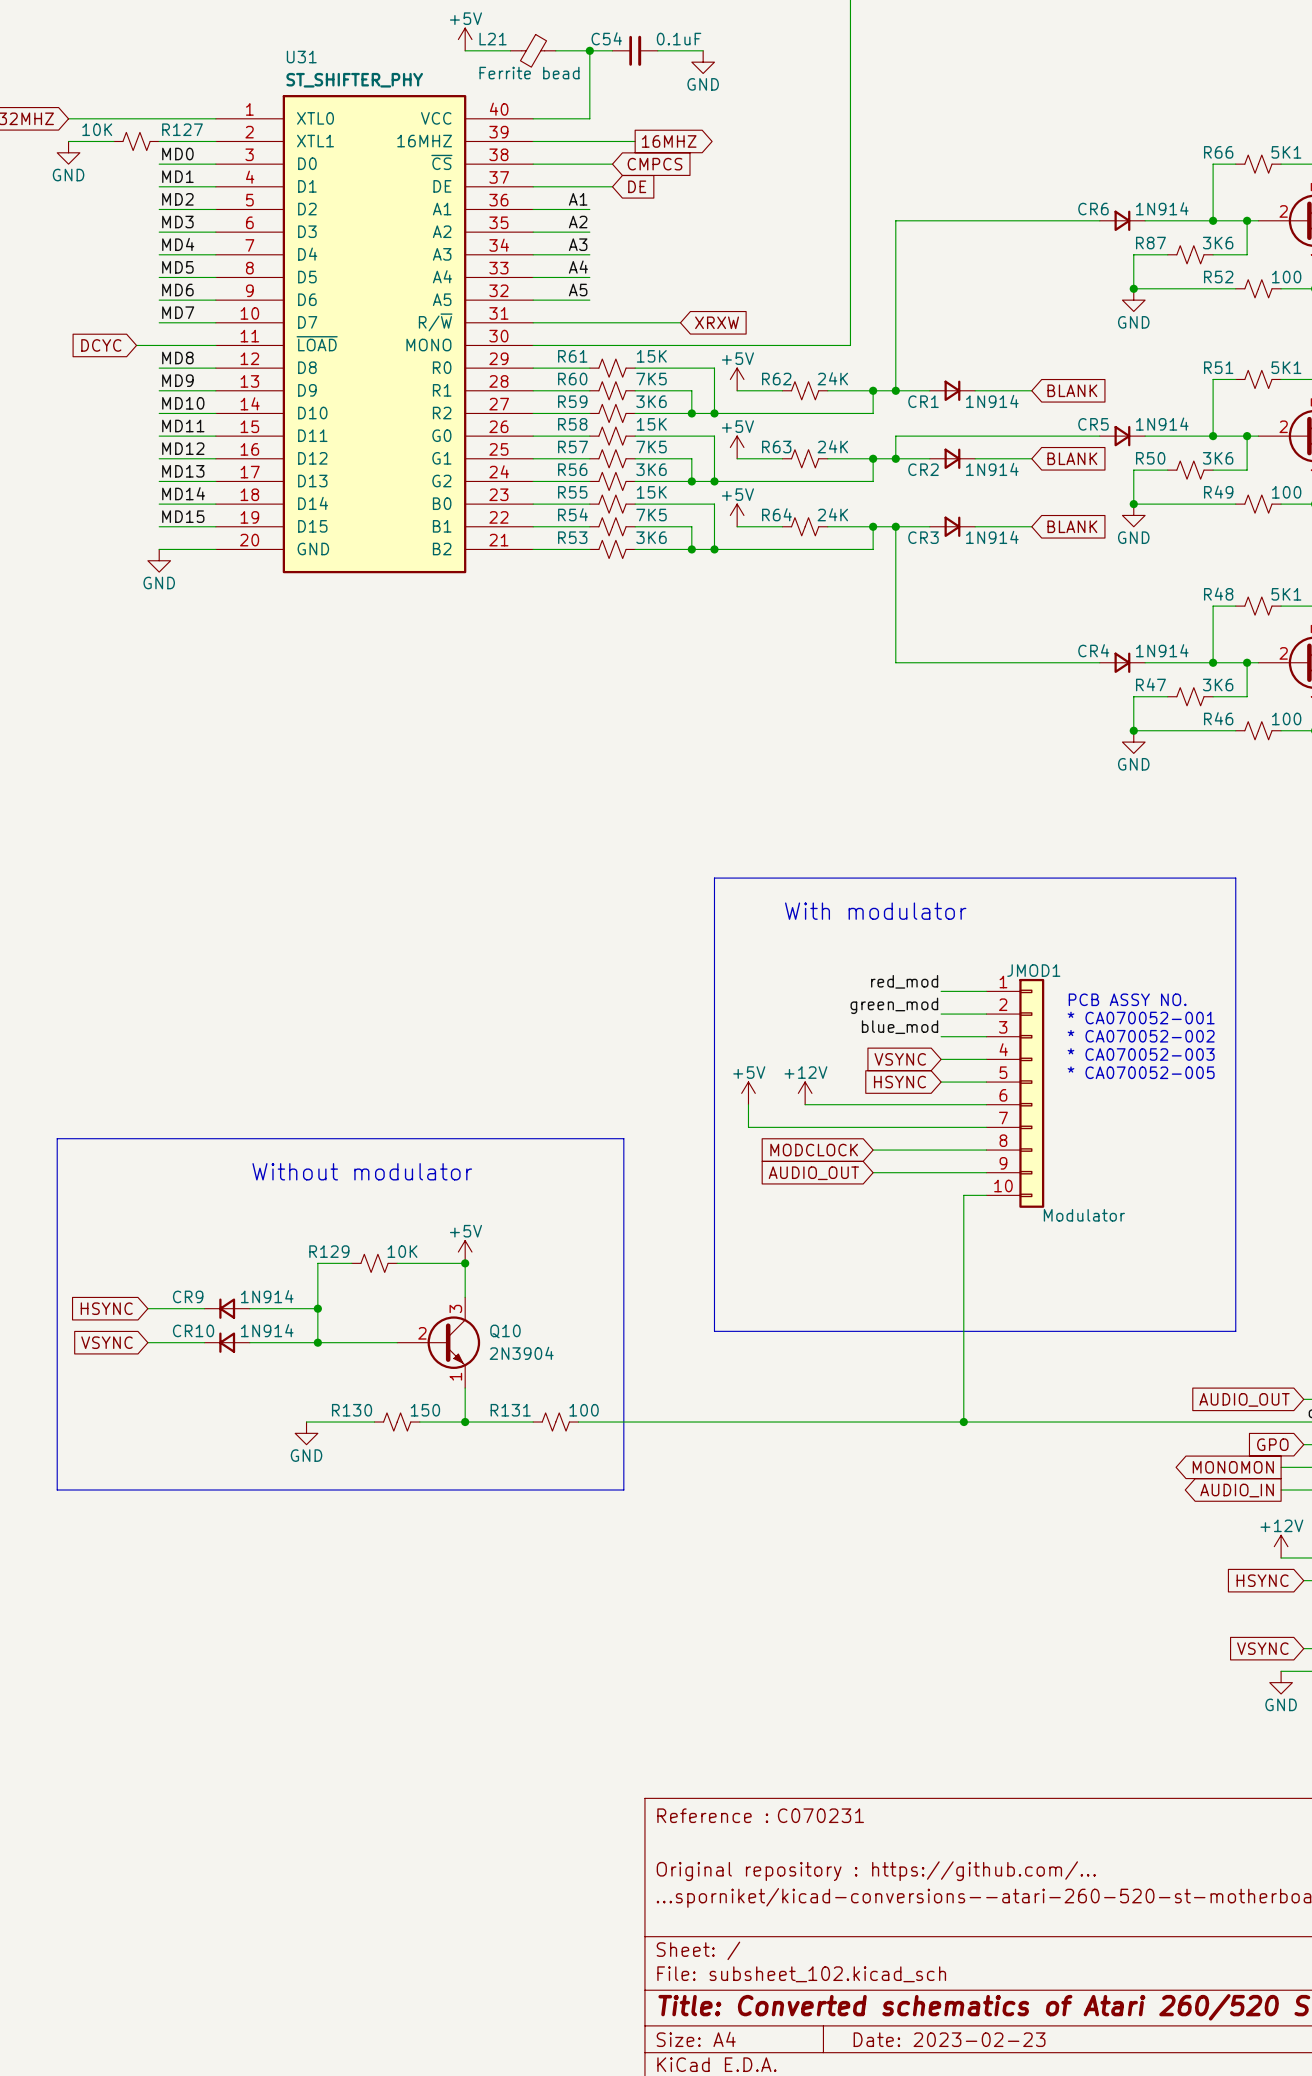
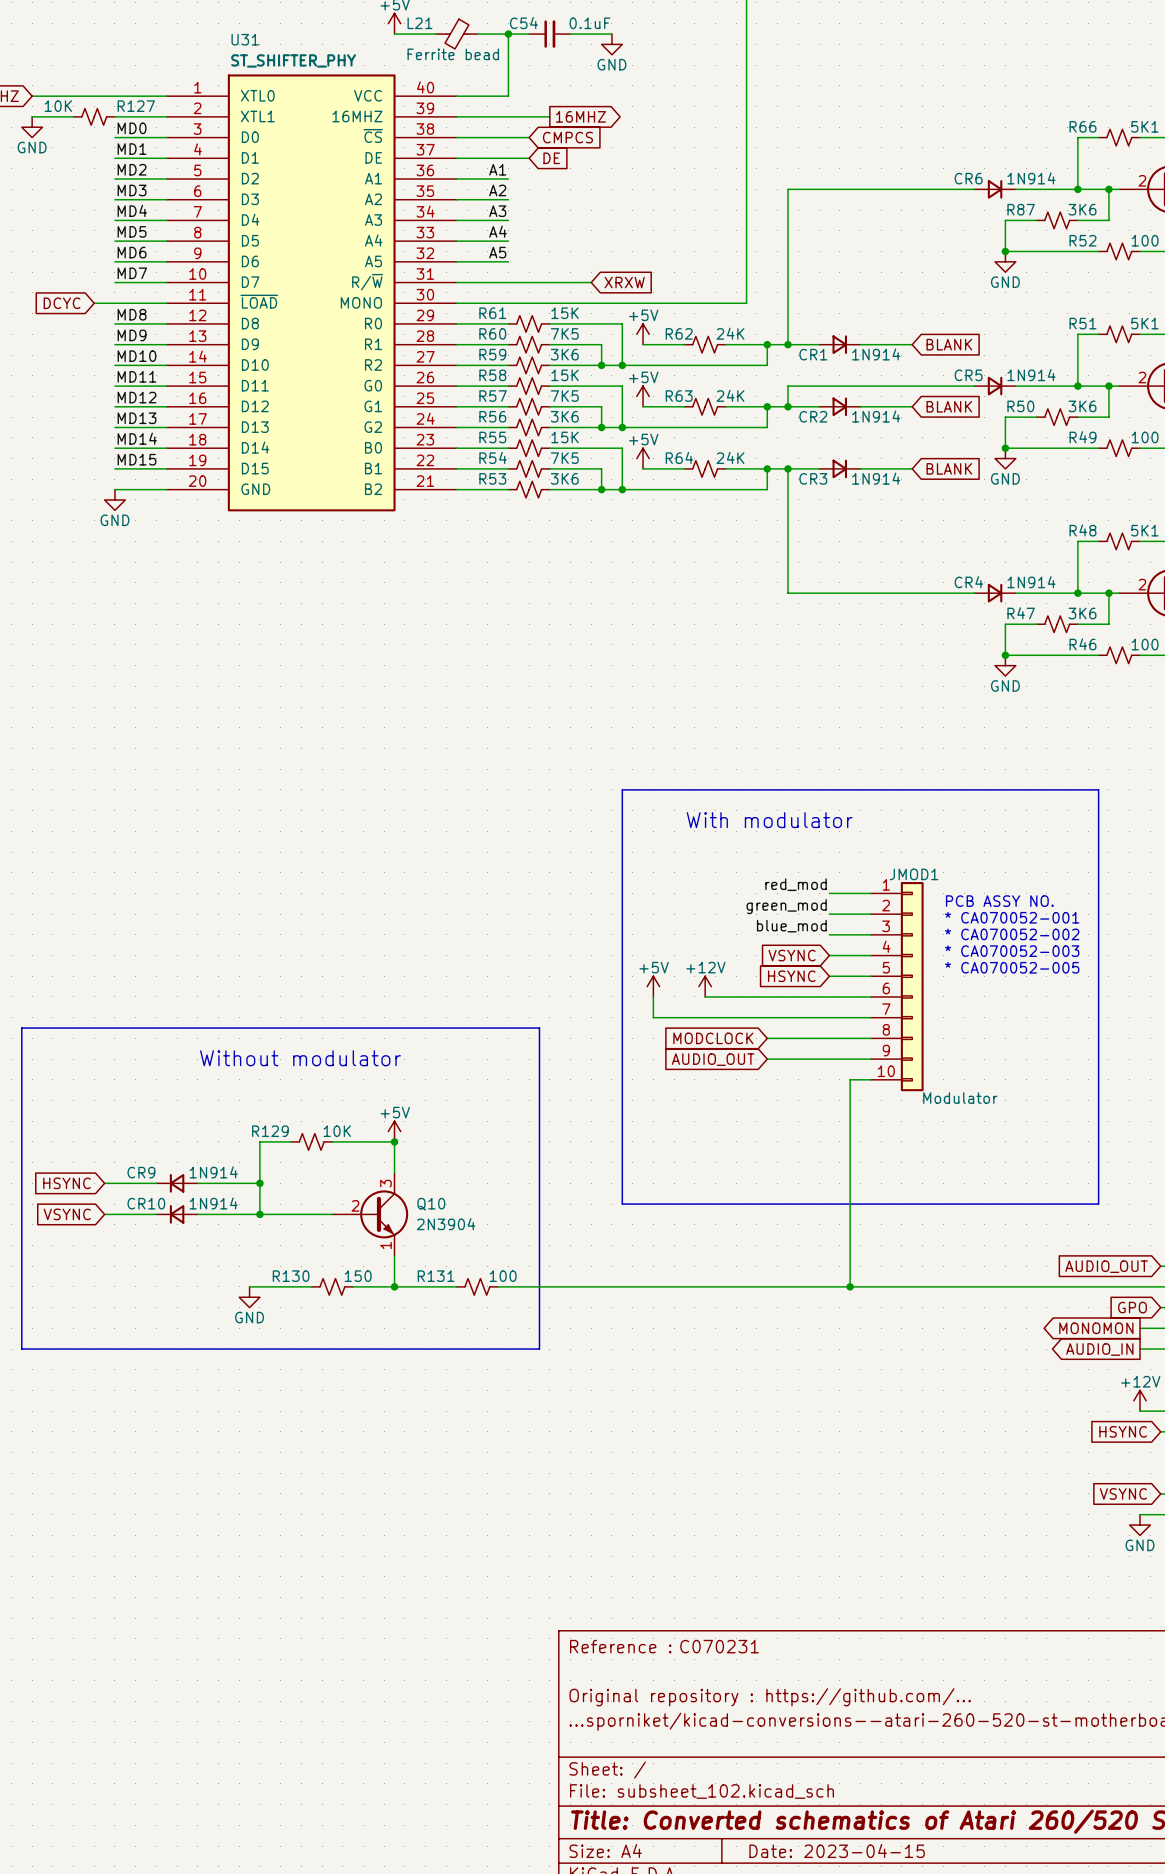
title block: Date: 2023-02-23 (949, 2039) -> Date: 2023-04-15 (837, 1850)

